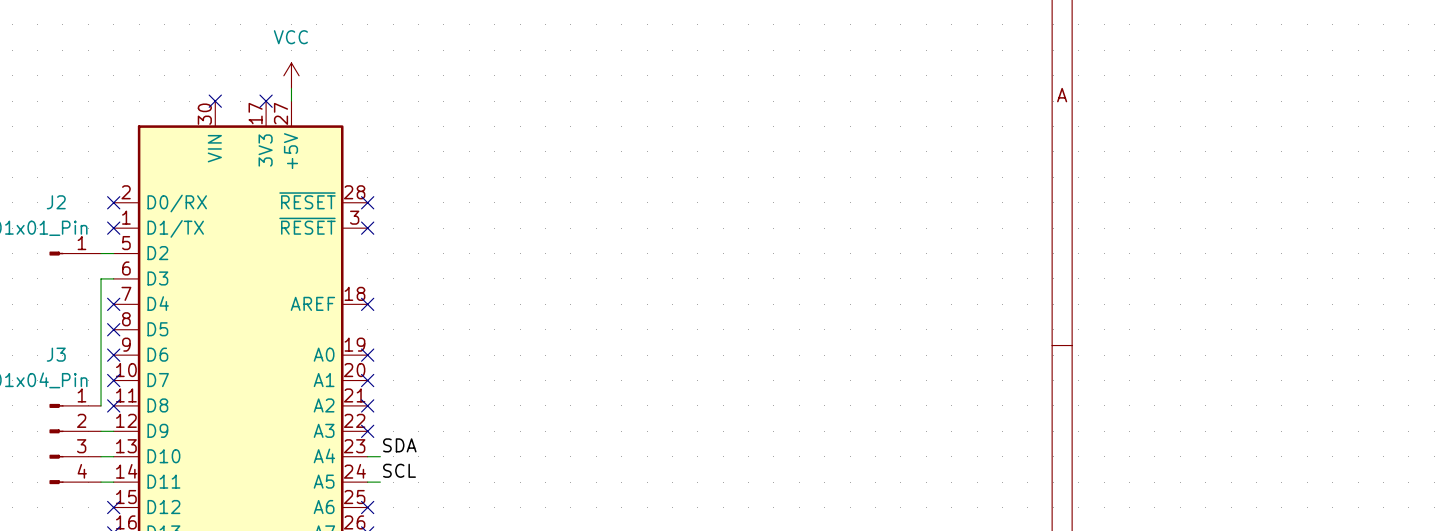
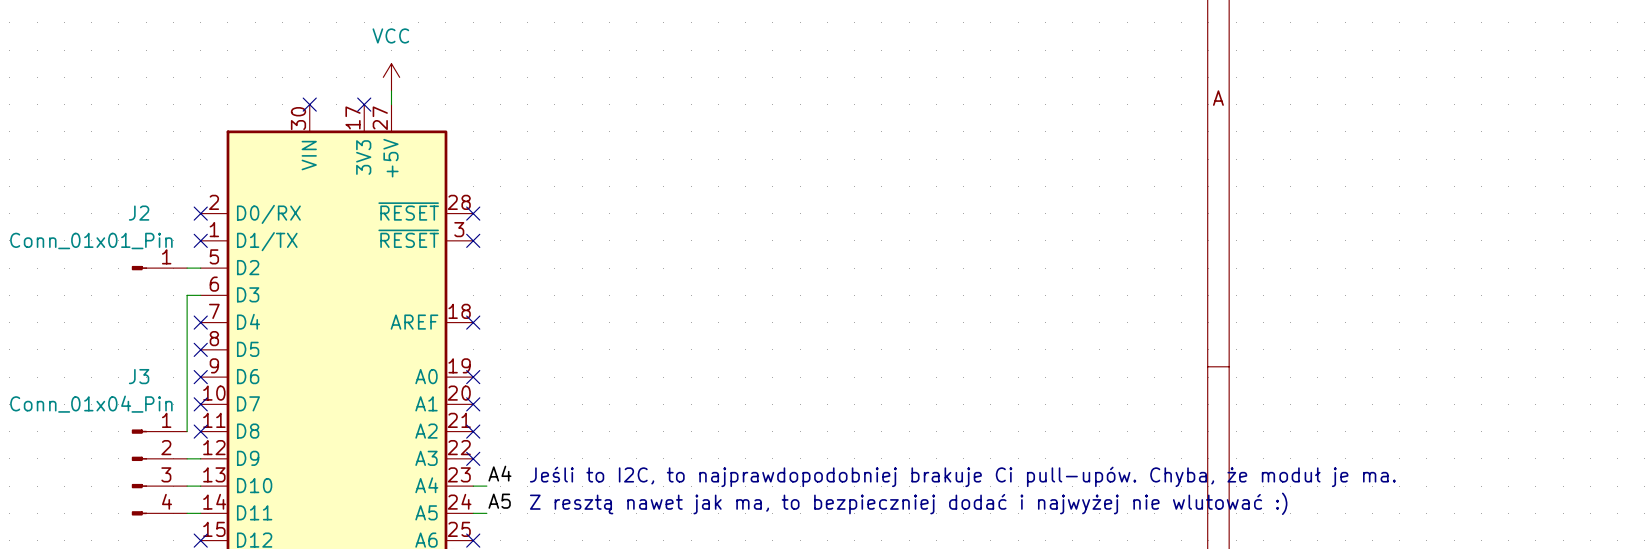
label: SDA (399, 445) -> A4 (499, 473)
text: none -> Jeśli to I2C, to najprawdopodobniej brakuje Ci pull-upów. Chyba, że moduł je ma. (962, 476)
label: SCL (399, 470) -> A5 (499, 501)
text: none -> Z resztą nawet jak ma, to bezpieczniej dodać i najwyżej nie wlutować :) (908, 503)

